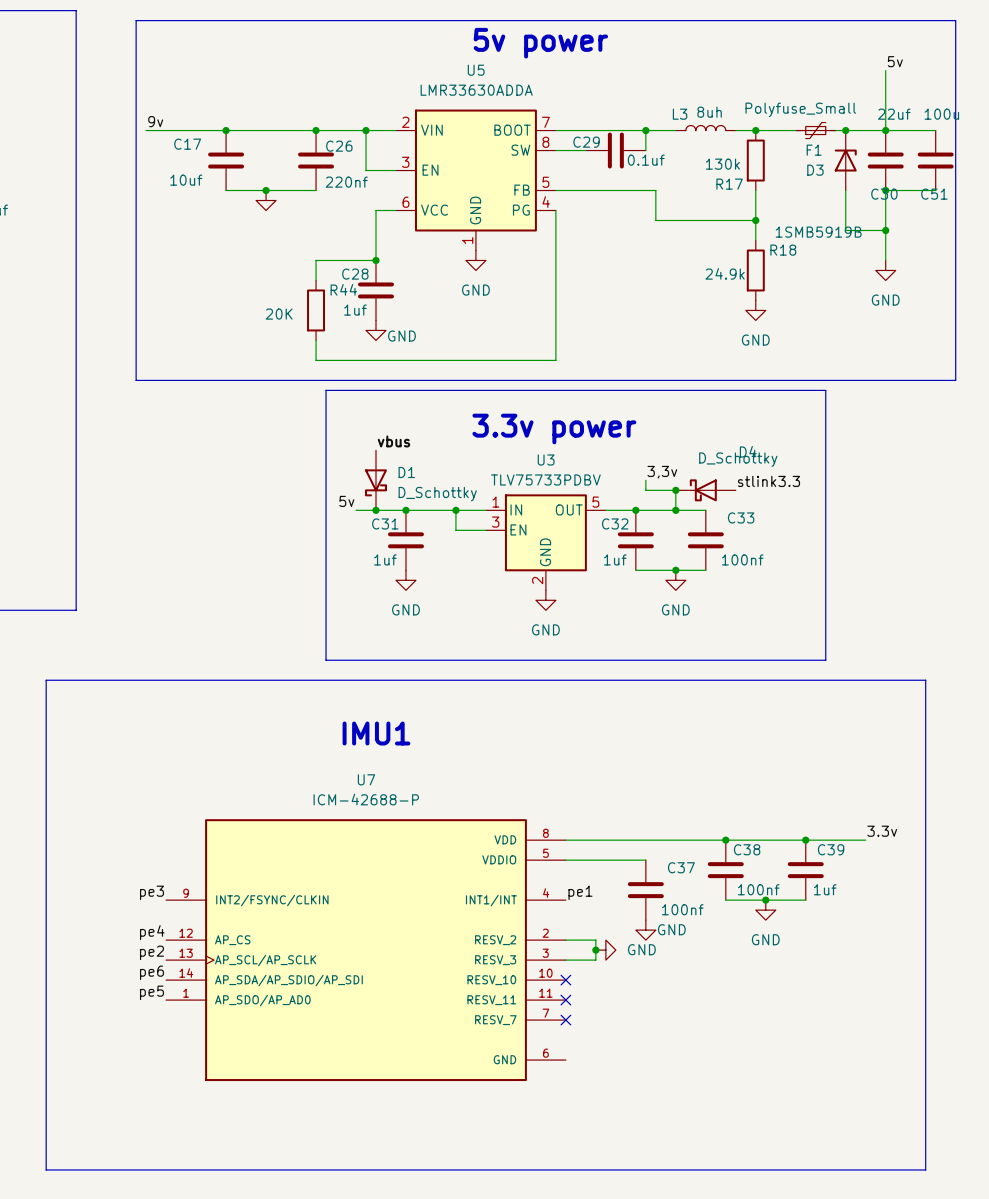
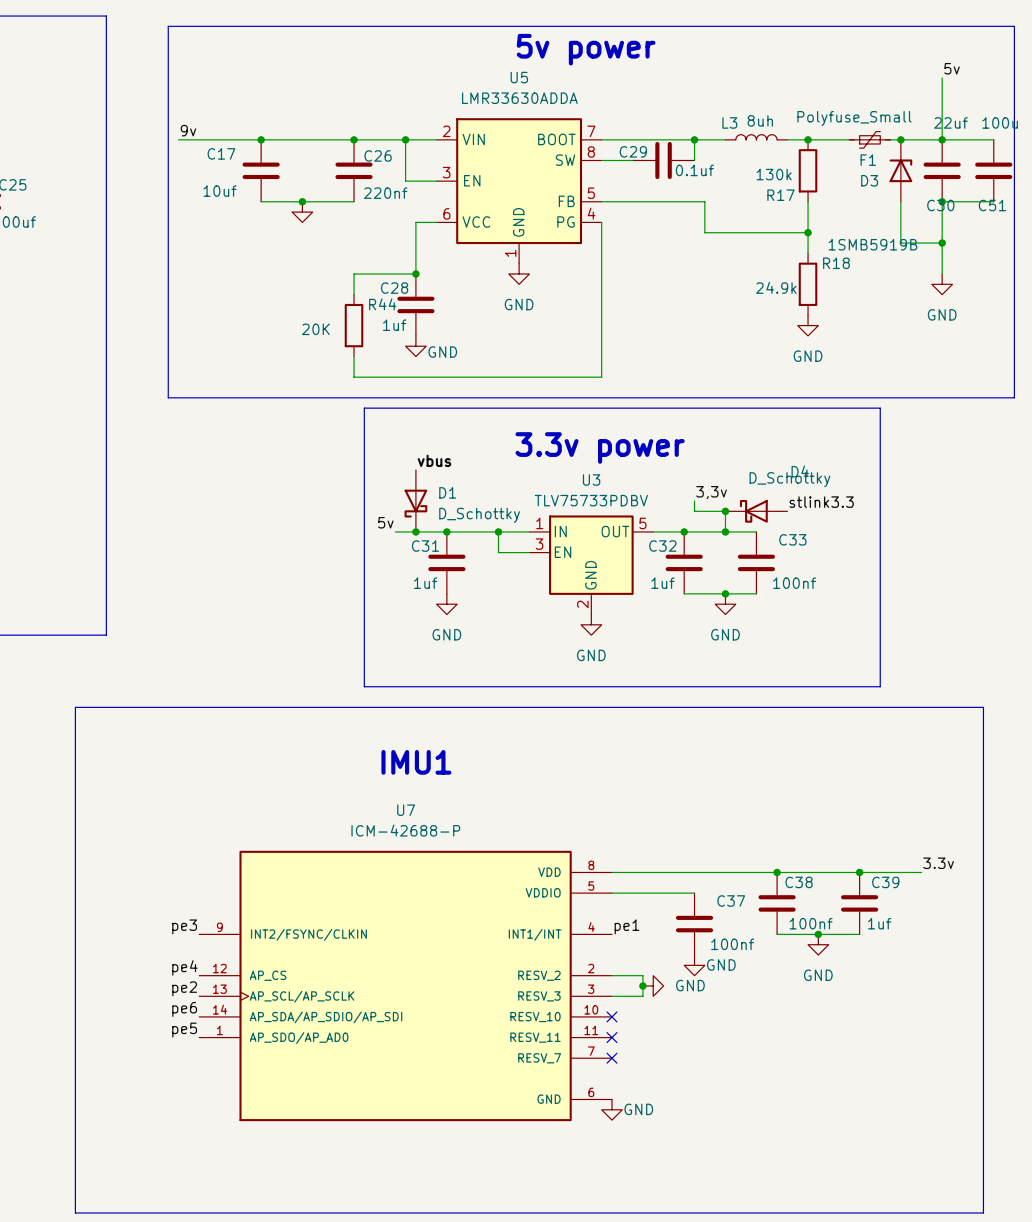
power symbol: none -> GND (611, 1109)

